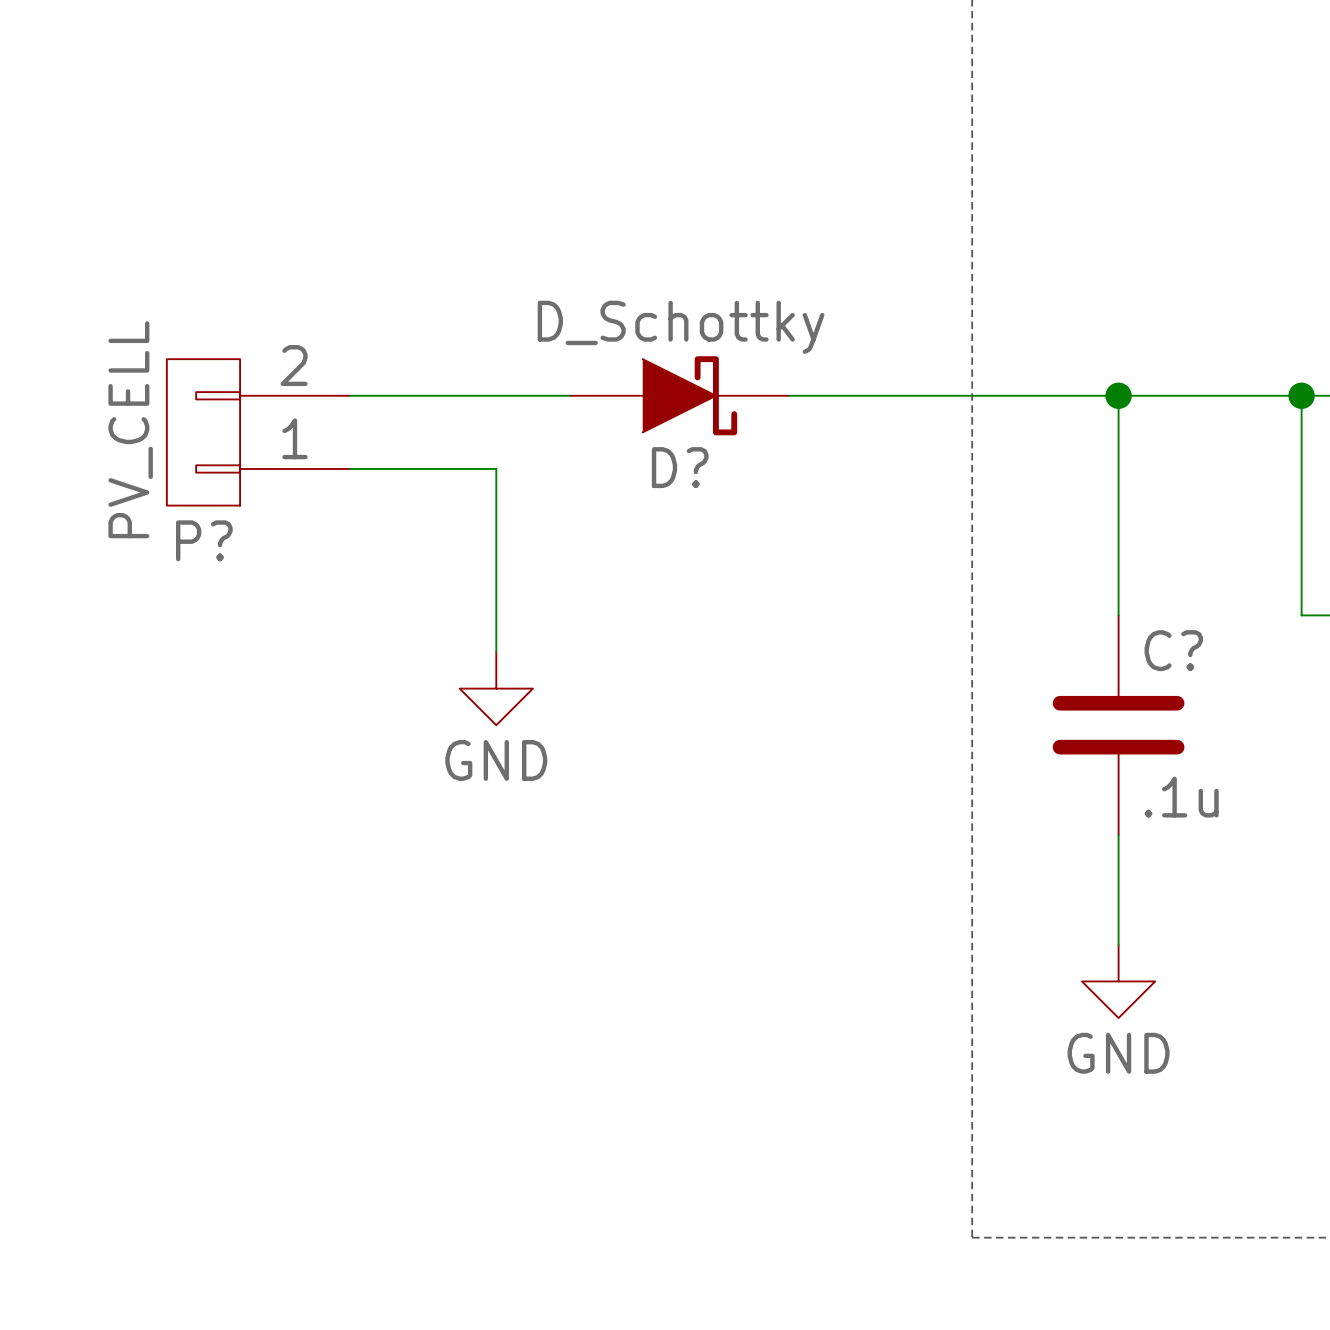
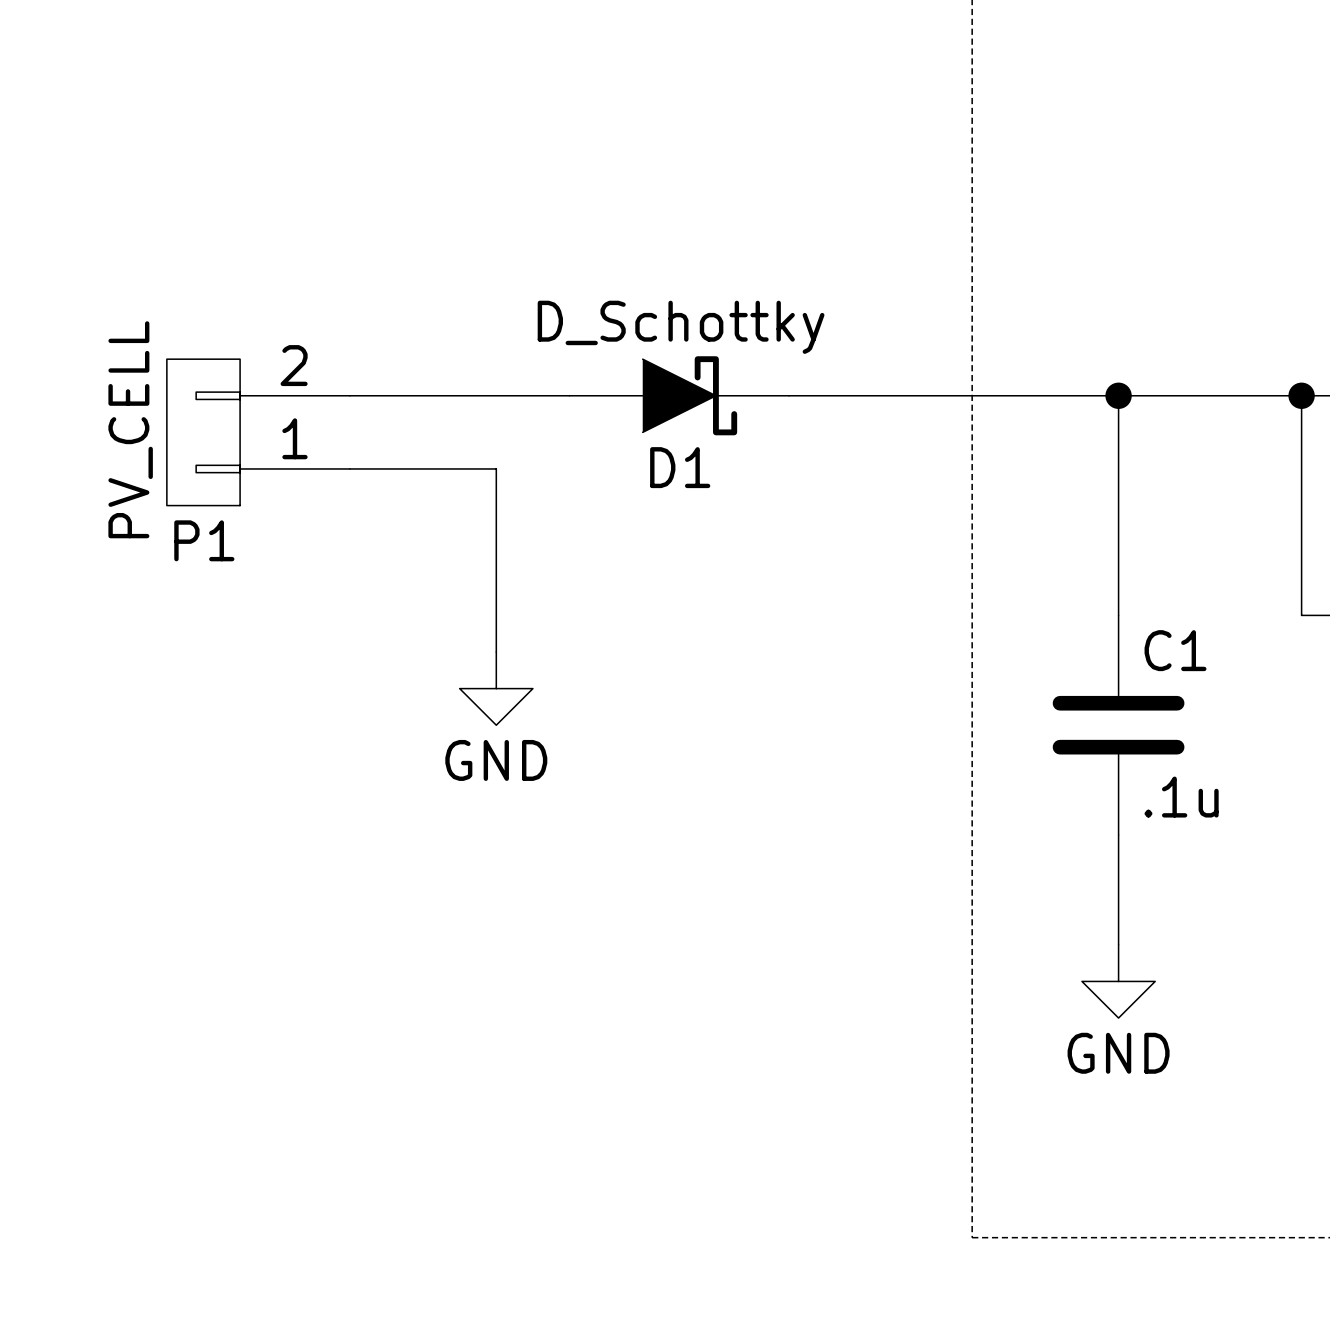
D? name: D? (680, 467) -> D1 (680, 467)
P? name: P? (204, 540) -> P1 (204, 540)
C? name: C? (1173, 650) -> C1 (1175, 650)

